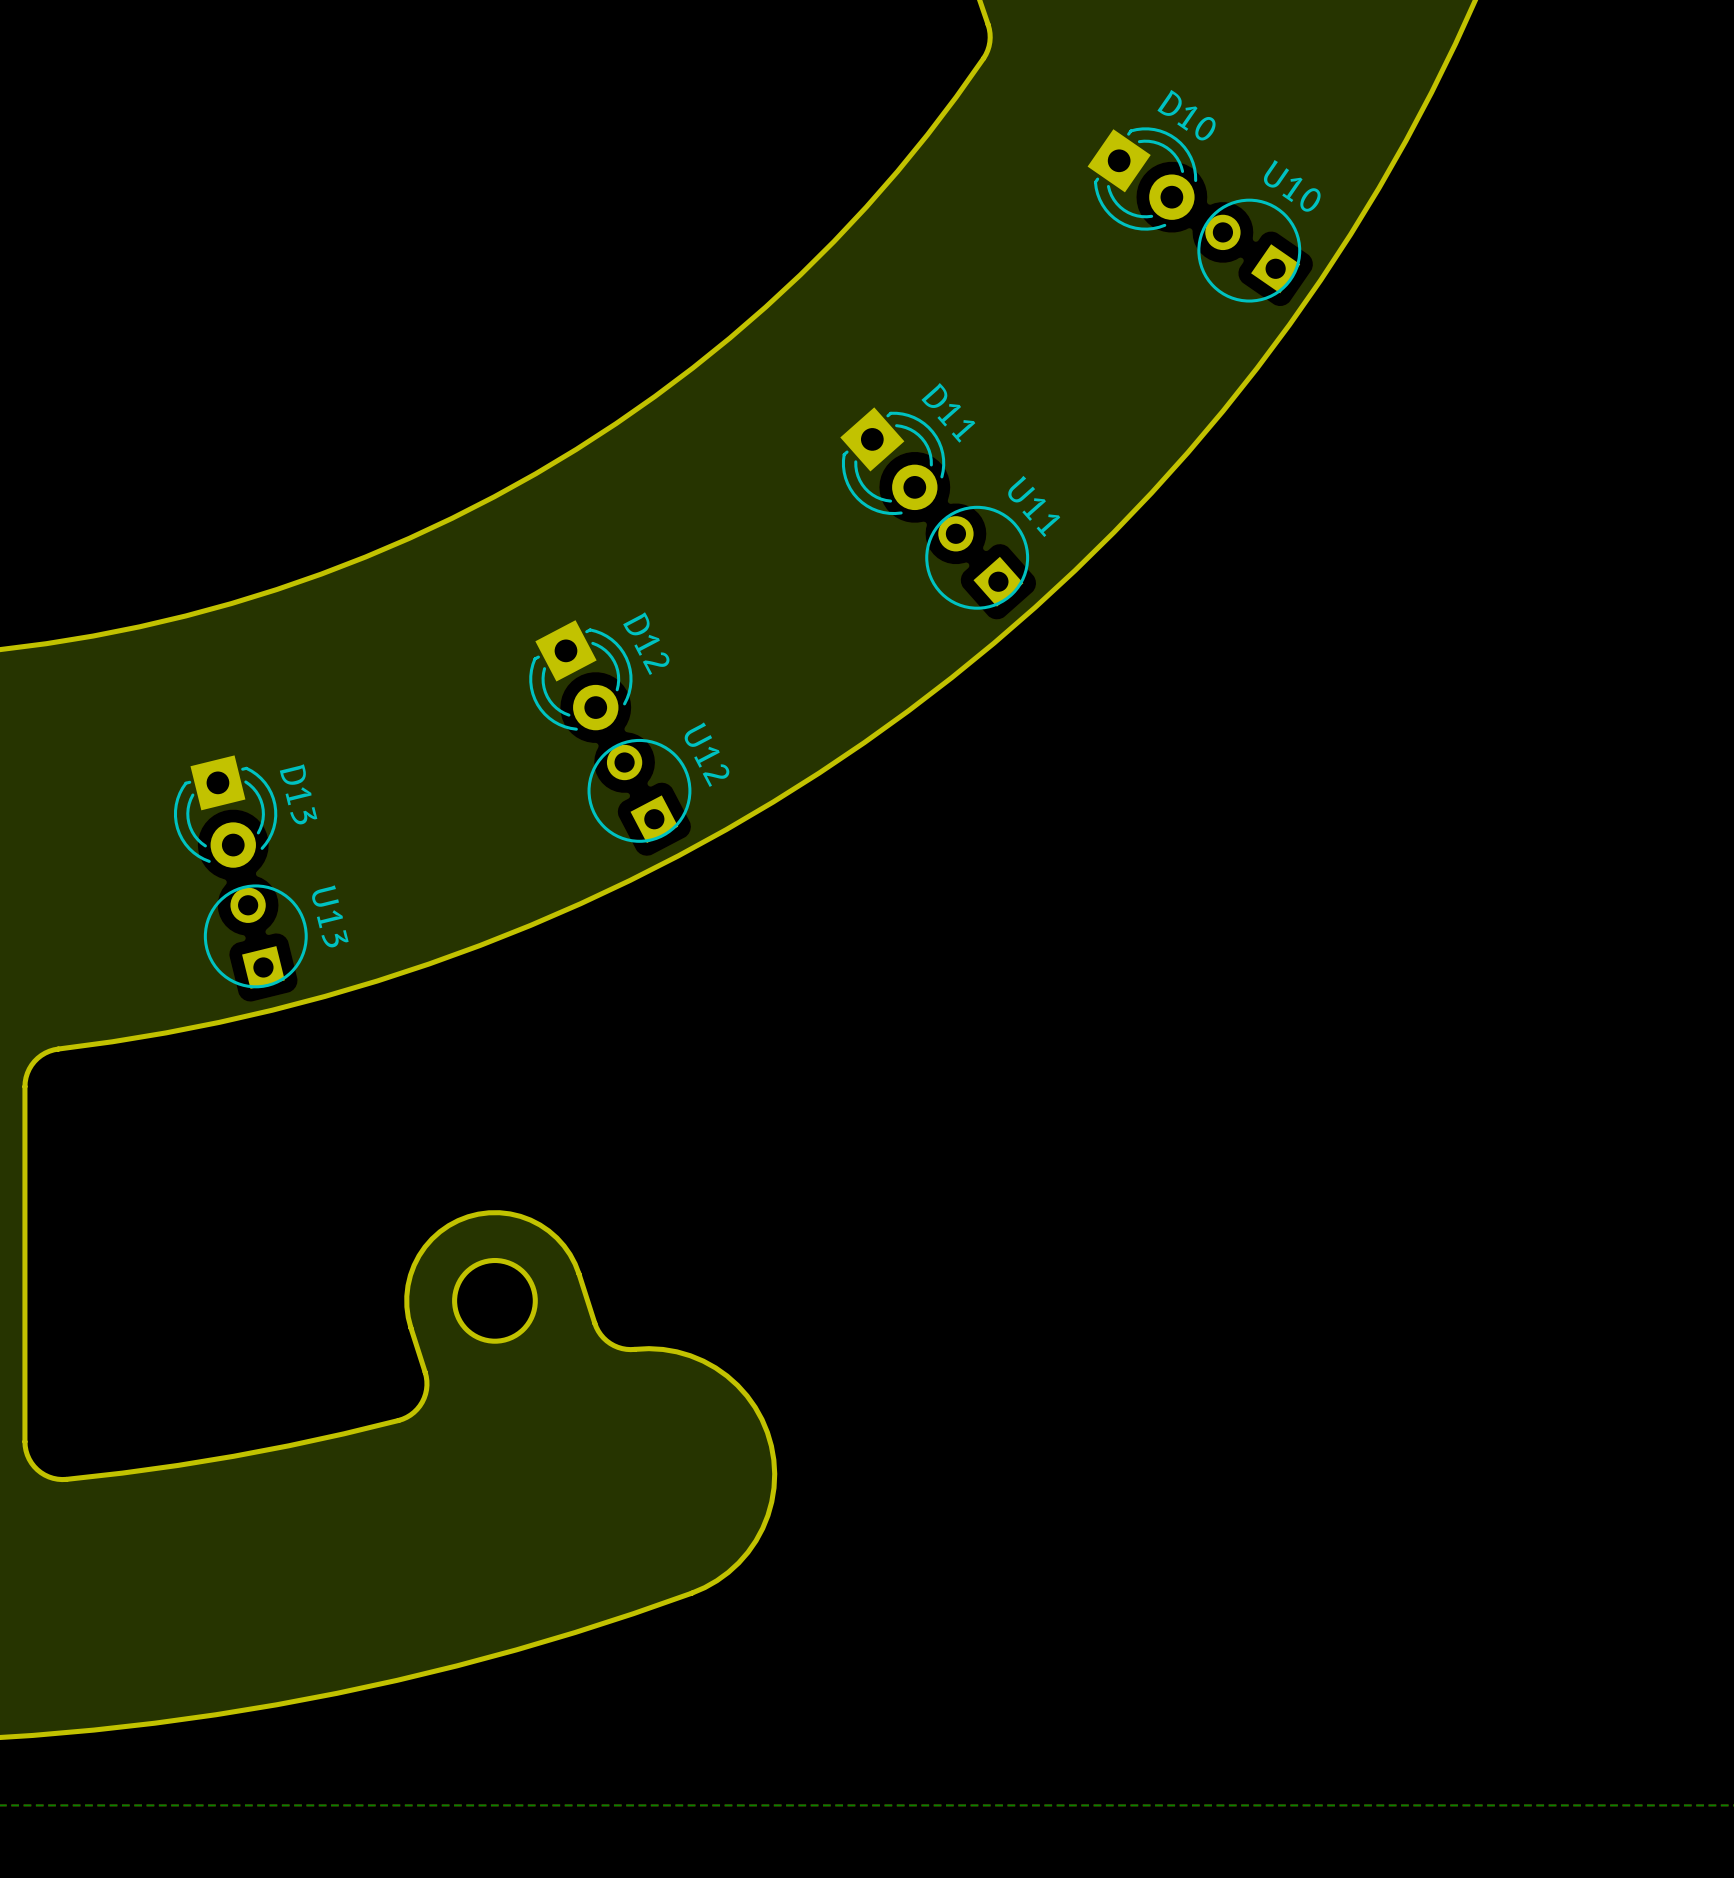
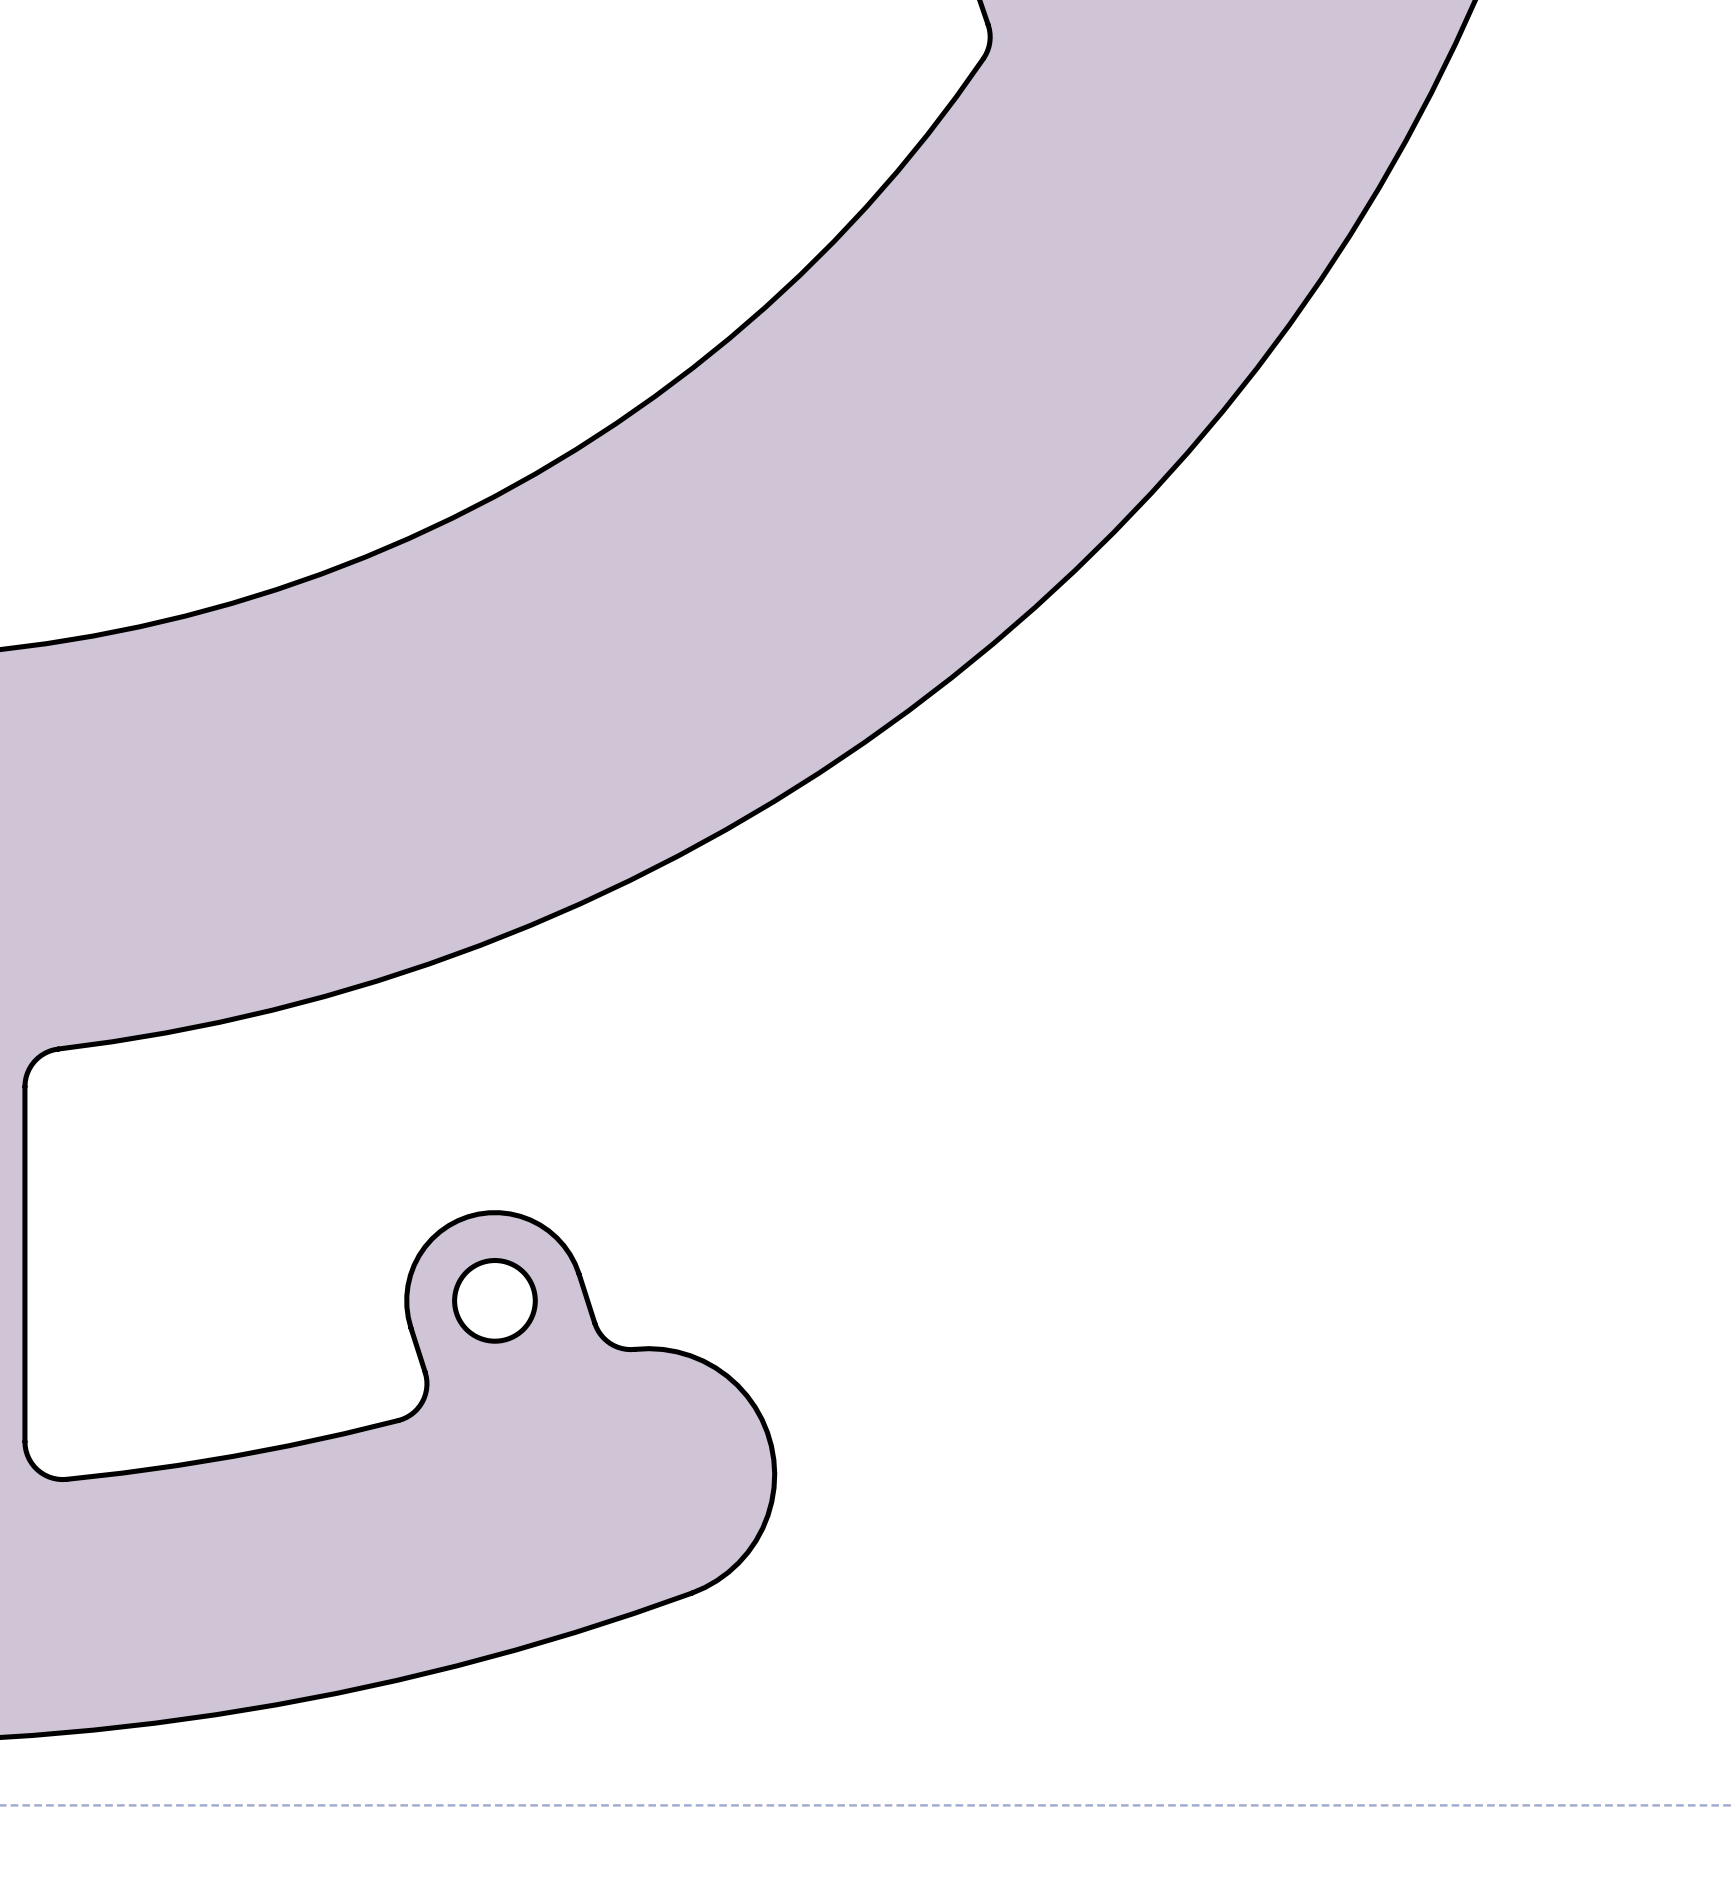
D10: (1142, 179) -> none
U10: (1249, 250) -> none
D11: (892, 461) -> none
U11: (977, 557) -> none
D12: (580, 675) -> none
U12: (639, 790) -> none
D13: (225, 811) -> none
U13: (255, 936) -> none

